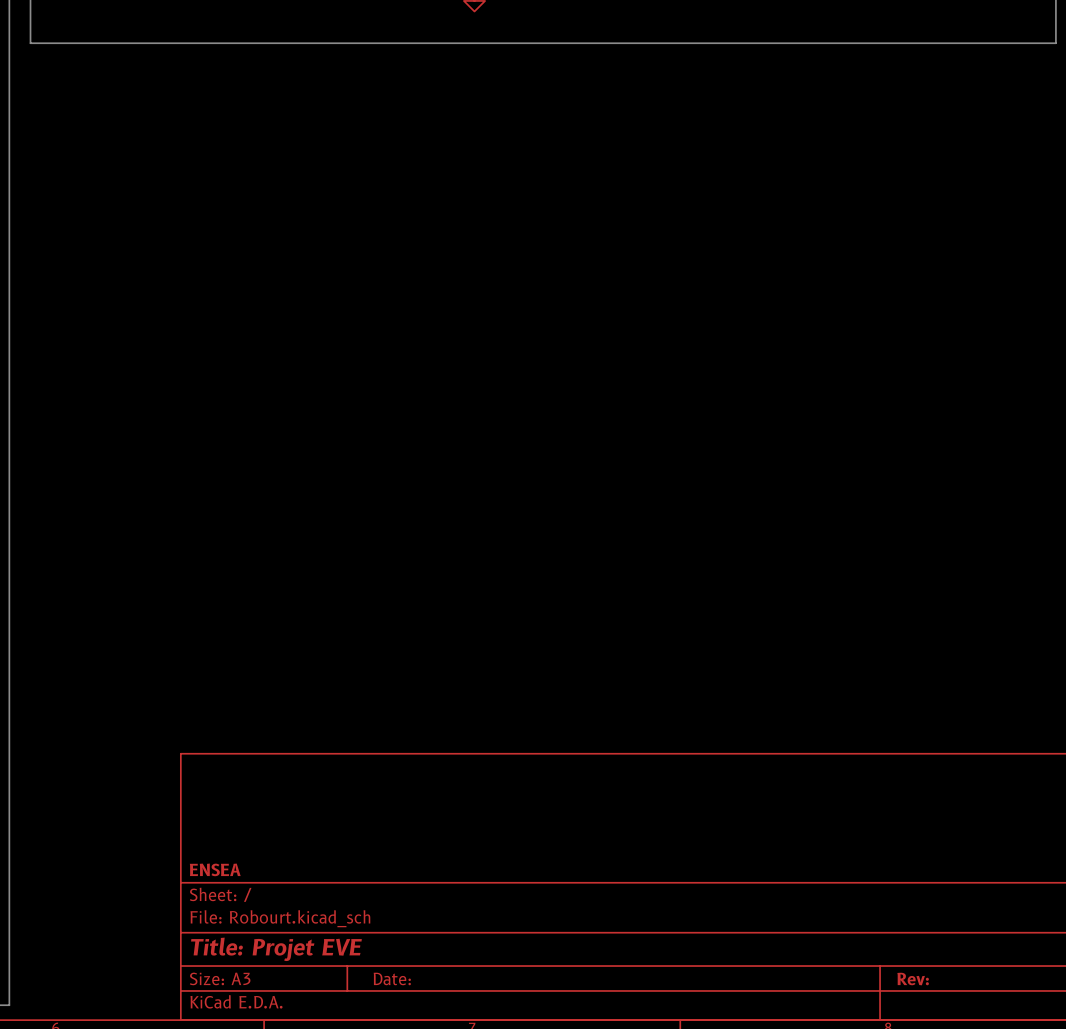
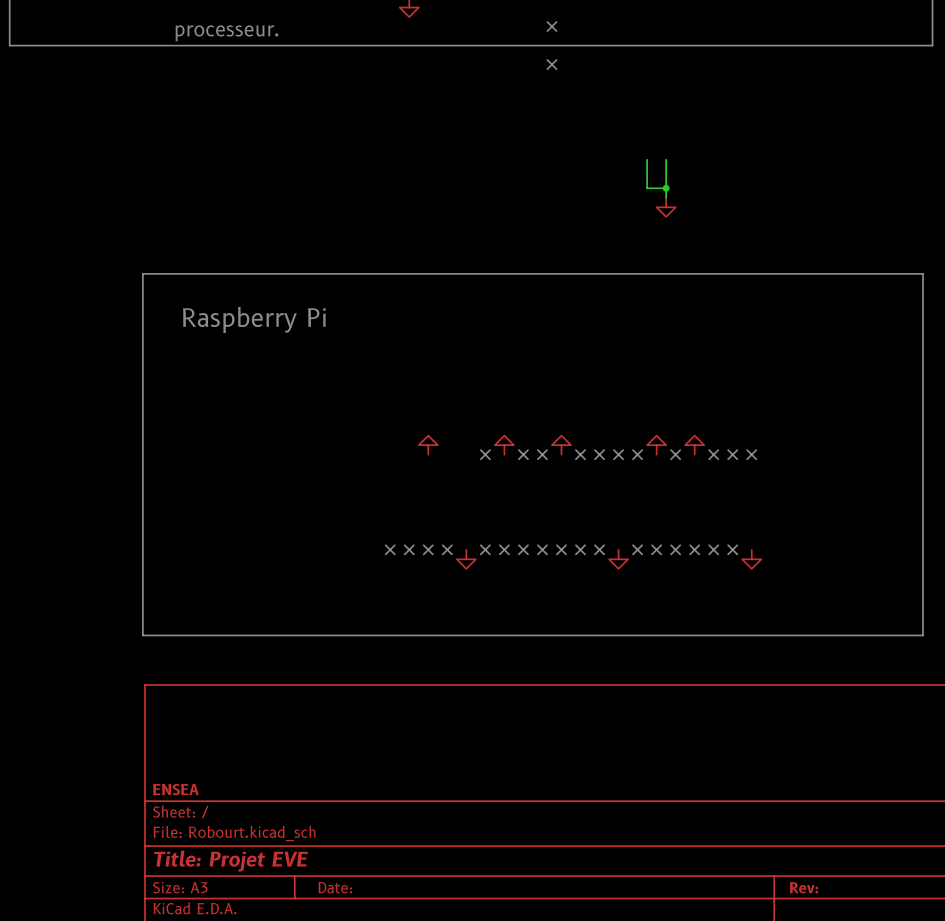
no-connect mark: none -> (551, 26)
text: none -> processeur. (227, 33)
no-connect mark: none -> (551, 64)
wire: none -> (647, 159) (647, 188) (666, 188)
wire: none -> (666, 159) (666, 197)
junction: none -> (666, 188)
power symbol: none -> (666, 207)
line: none -> (142, 273) (923, 273) (923, 635) (142, 635) (142, 273)
text: none -> Raspberry Pi (254, 319)
power symbol: none -> (428, 445)
power symbol: none -> (504, 445)
power symbol: none -> (561, 445)
power symbol: none -> (656, 445)
power symbol: none -> (694, 445)
no-connect mark: none -> (485, 454)
no-connect mark: none -> (523, 454)
no-connect mark: none -> (542, 454)
no-connect mark: none -> (580, 454)
no-connect mark: none -> (599, 454)
no-connect mark: none -> (618, 454)
no-connect mark: none -> (637, 454)
no-connect mark: none -> (675, 454)
no-connect mark: none -> (713, 454)
no-connect mark: none -> (732, 454)
no-connect mark: none -> (751, 454)
no-connect mark: none -> (390, 549)
no-connect mark: none -> (409, 549)
no-connect mark: none -> (428, 549)
no-connect mark: none -> (447, 549)
no-connect mark: none -> (485, 549)
no-connect mark: none -> (504, 549)
no-connect mark: none -> (523, 549)
no-connect mark: none -> (542, 549)
no-connect mark: none -> (561, 549)
no-connect mark: none -> (580, 549)
no-connect mark: none -> (599, 549)
no-connect mark: none -> (637, 549)
no-connect mark: none -> (656, 549)
no-connect mark: none -> (675, 549)
no-connect mark: none -> (694, 549)
no-connect mark: none -> (713, 549)
no-connect mark: none -> (732, 549)
power symbol: none -> (466, 559)
power symbol: none -> (618, 559)
power symbol: none -> (751, 559)

